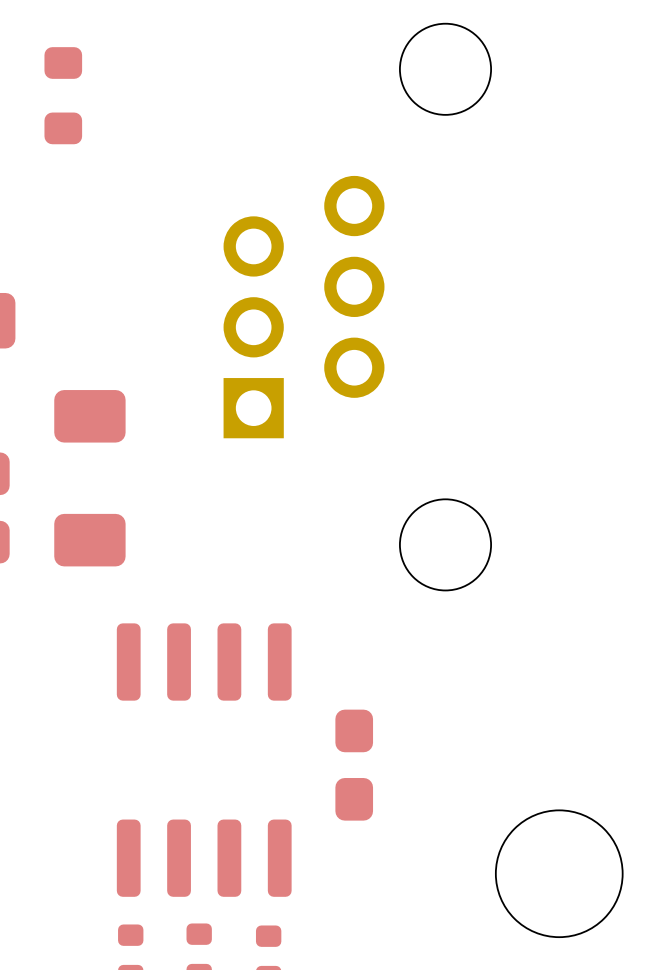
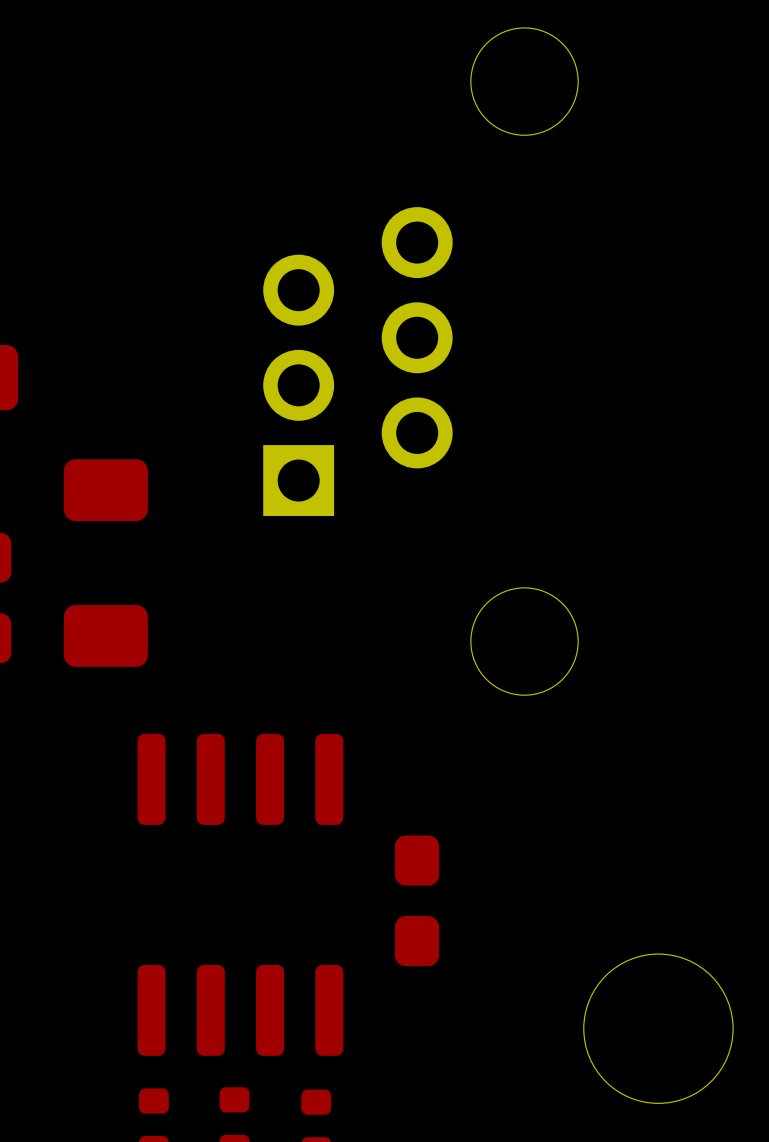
part: (63, 95) -> none

